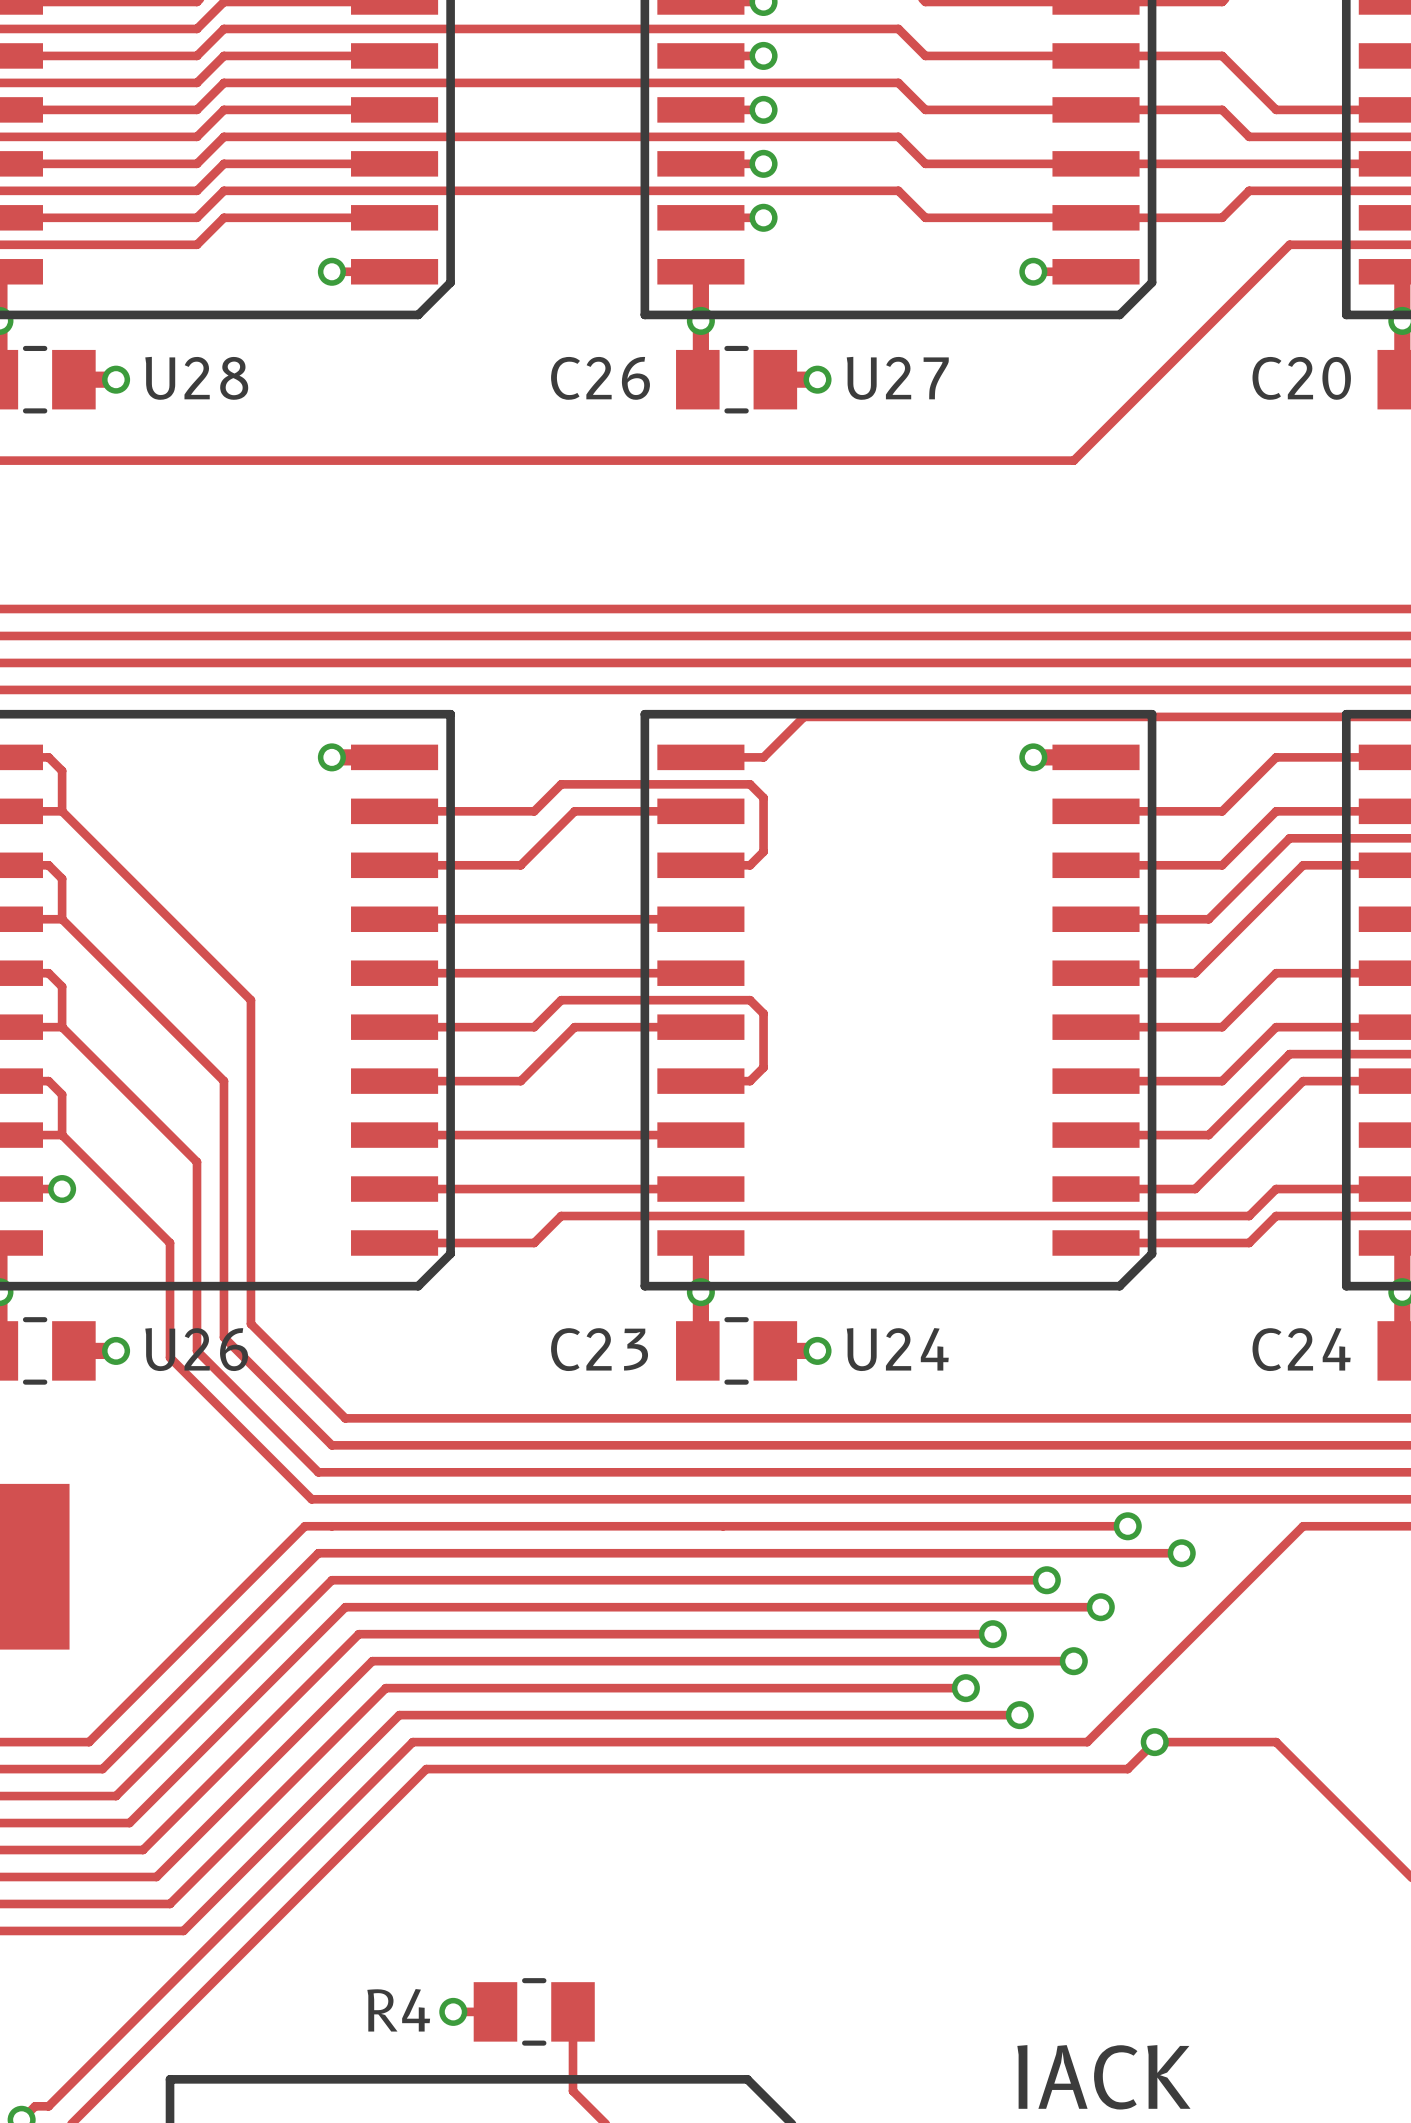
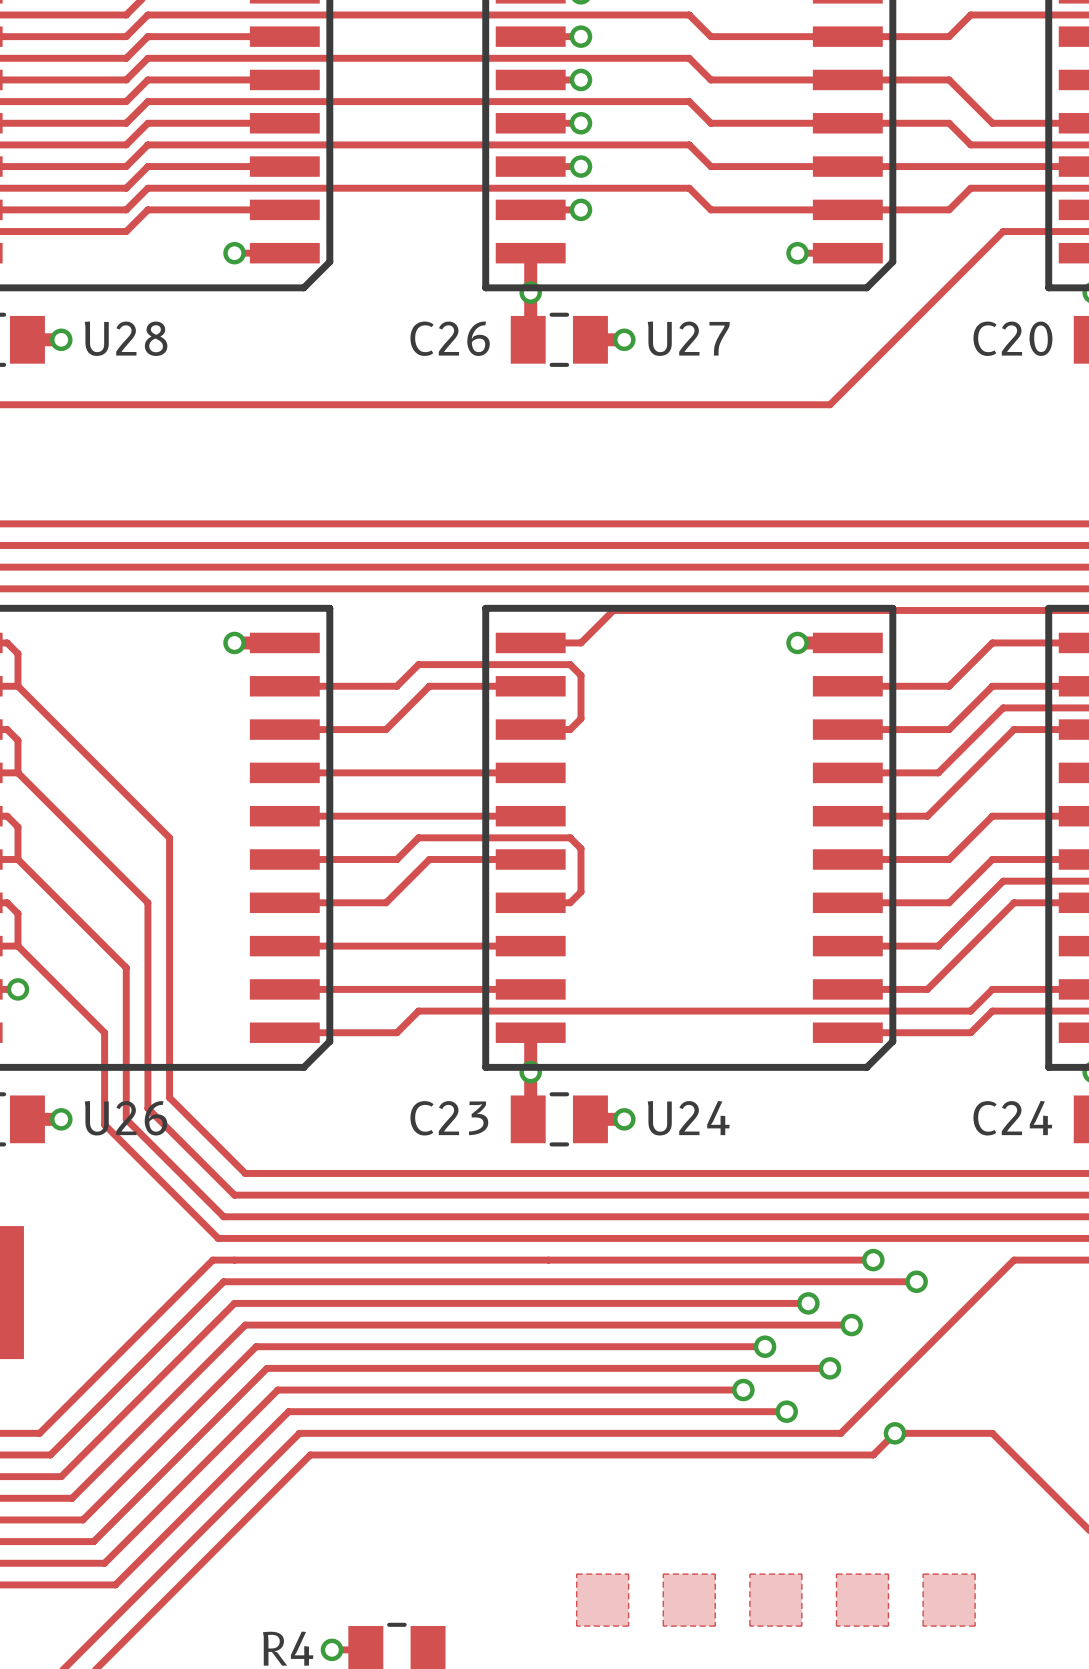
zone outline: none -> (576, 1574) (628, 1574) (628, 1626) (576, 1626) (576, 1574)
zone outline: none -> (663, 1574) (715, 1574) (715, 1626) (663, 1626) (663, 1574)
zone outline: none -> (749, 1574) (801, 1574) (801, 1626) (749, 1626) (749, 1574)
zone outline: none -> (836, 1574) (888, 1574) (888, 1626) (836, 1626) (836, 1574)
zone outline: none -> (923, 1574) (975, 1574) (975, 1626) (923, 1626) (923, 1574)

